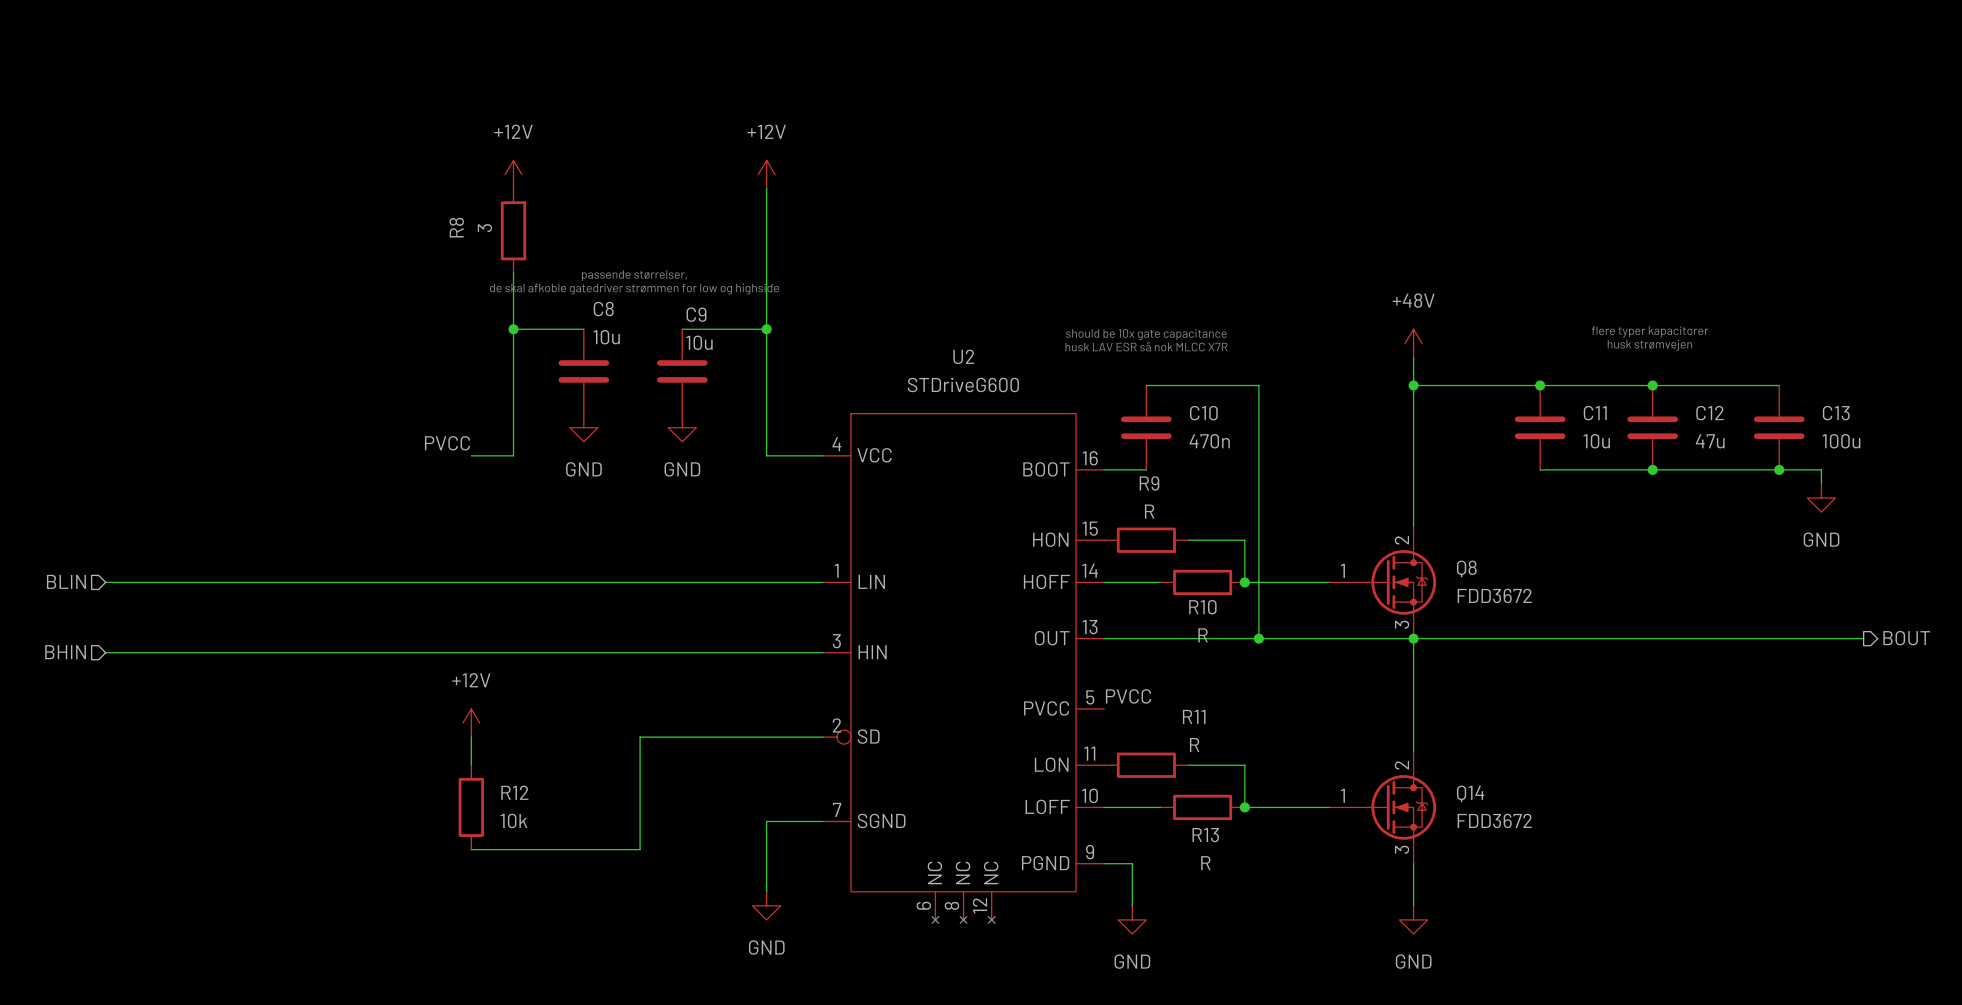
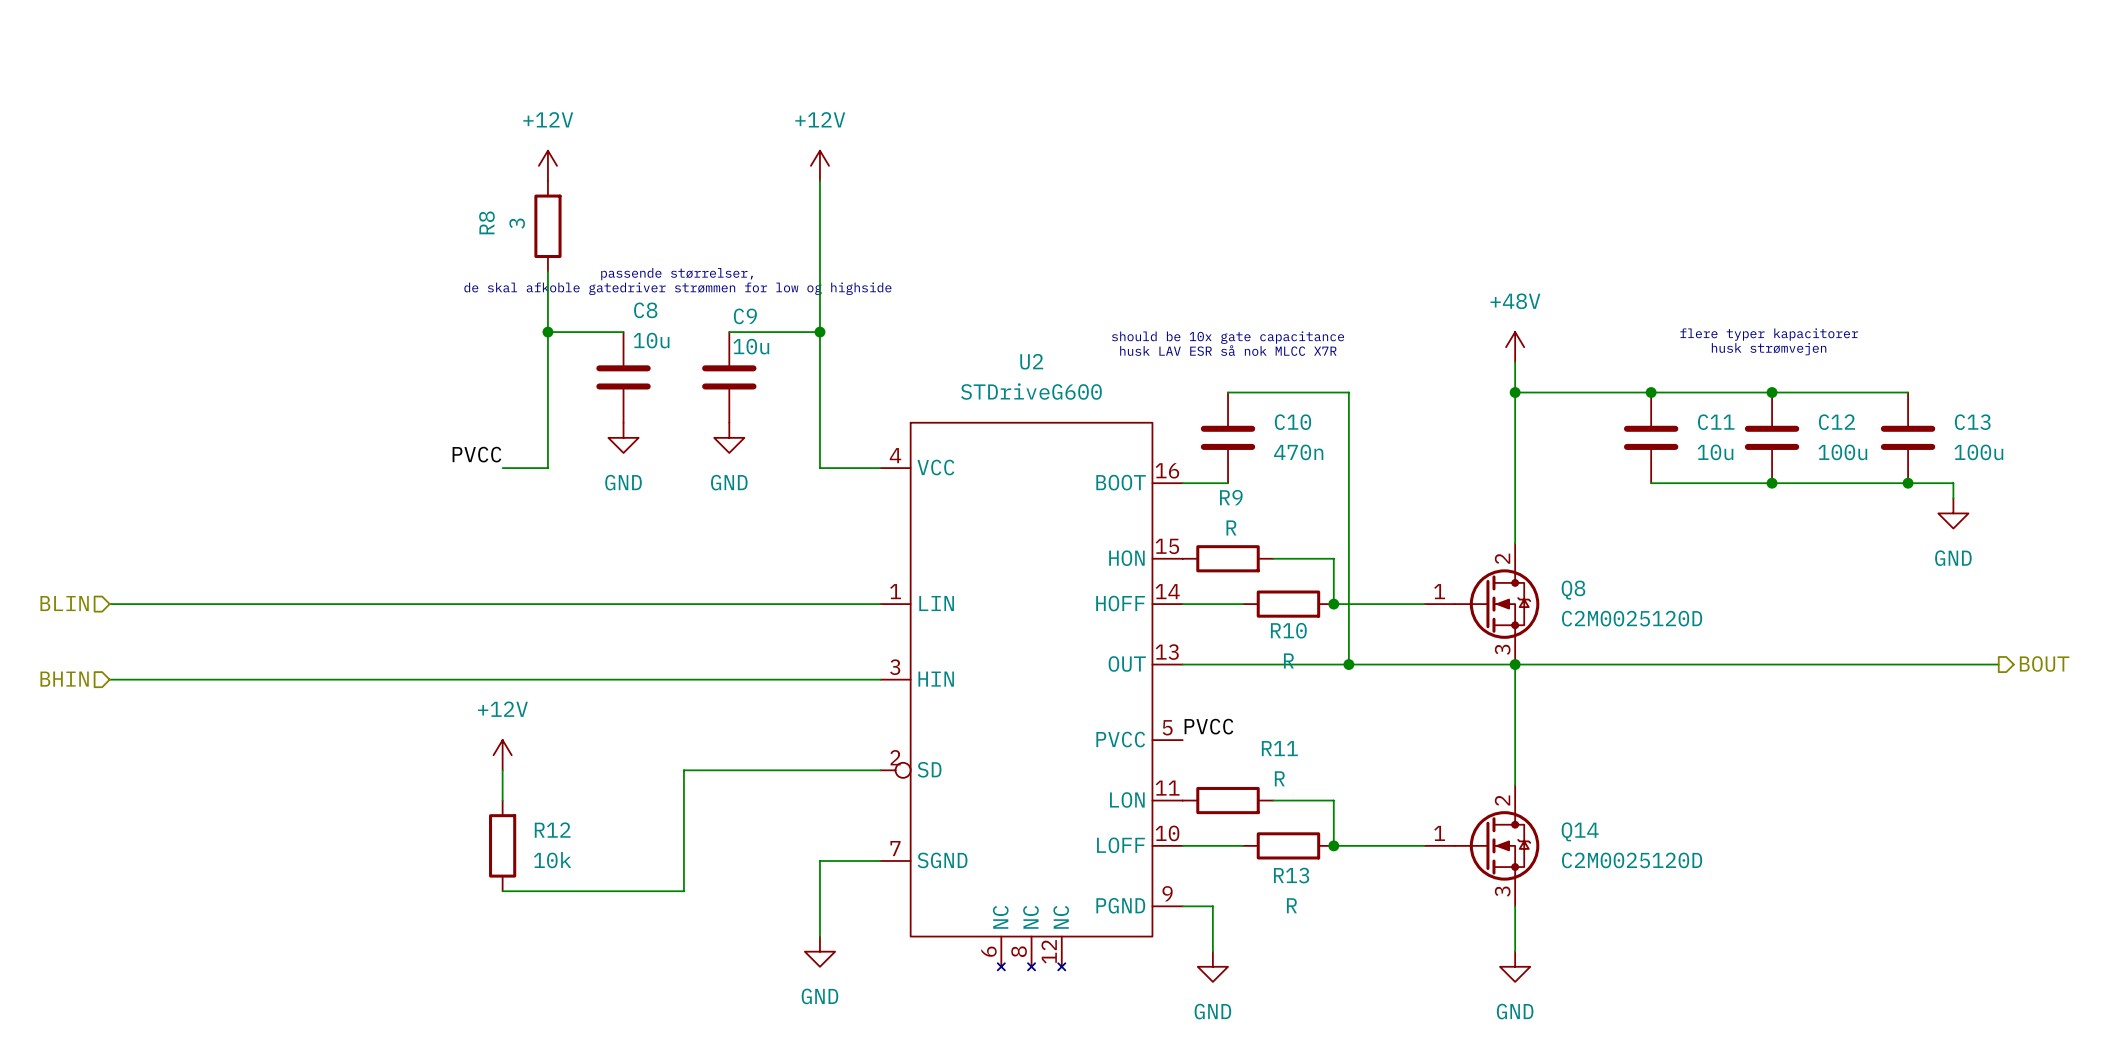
C12 value: 47u (1710, 441) -> 100u (1842, 452)
Q8 value: FDD3672 (1494, 595) -> C2M0025120D (1632, 618)
Q14 value: FDD3672 (1494, 820) -> C2M0025120D (1632, 860)

